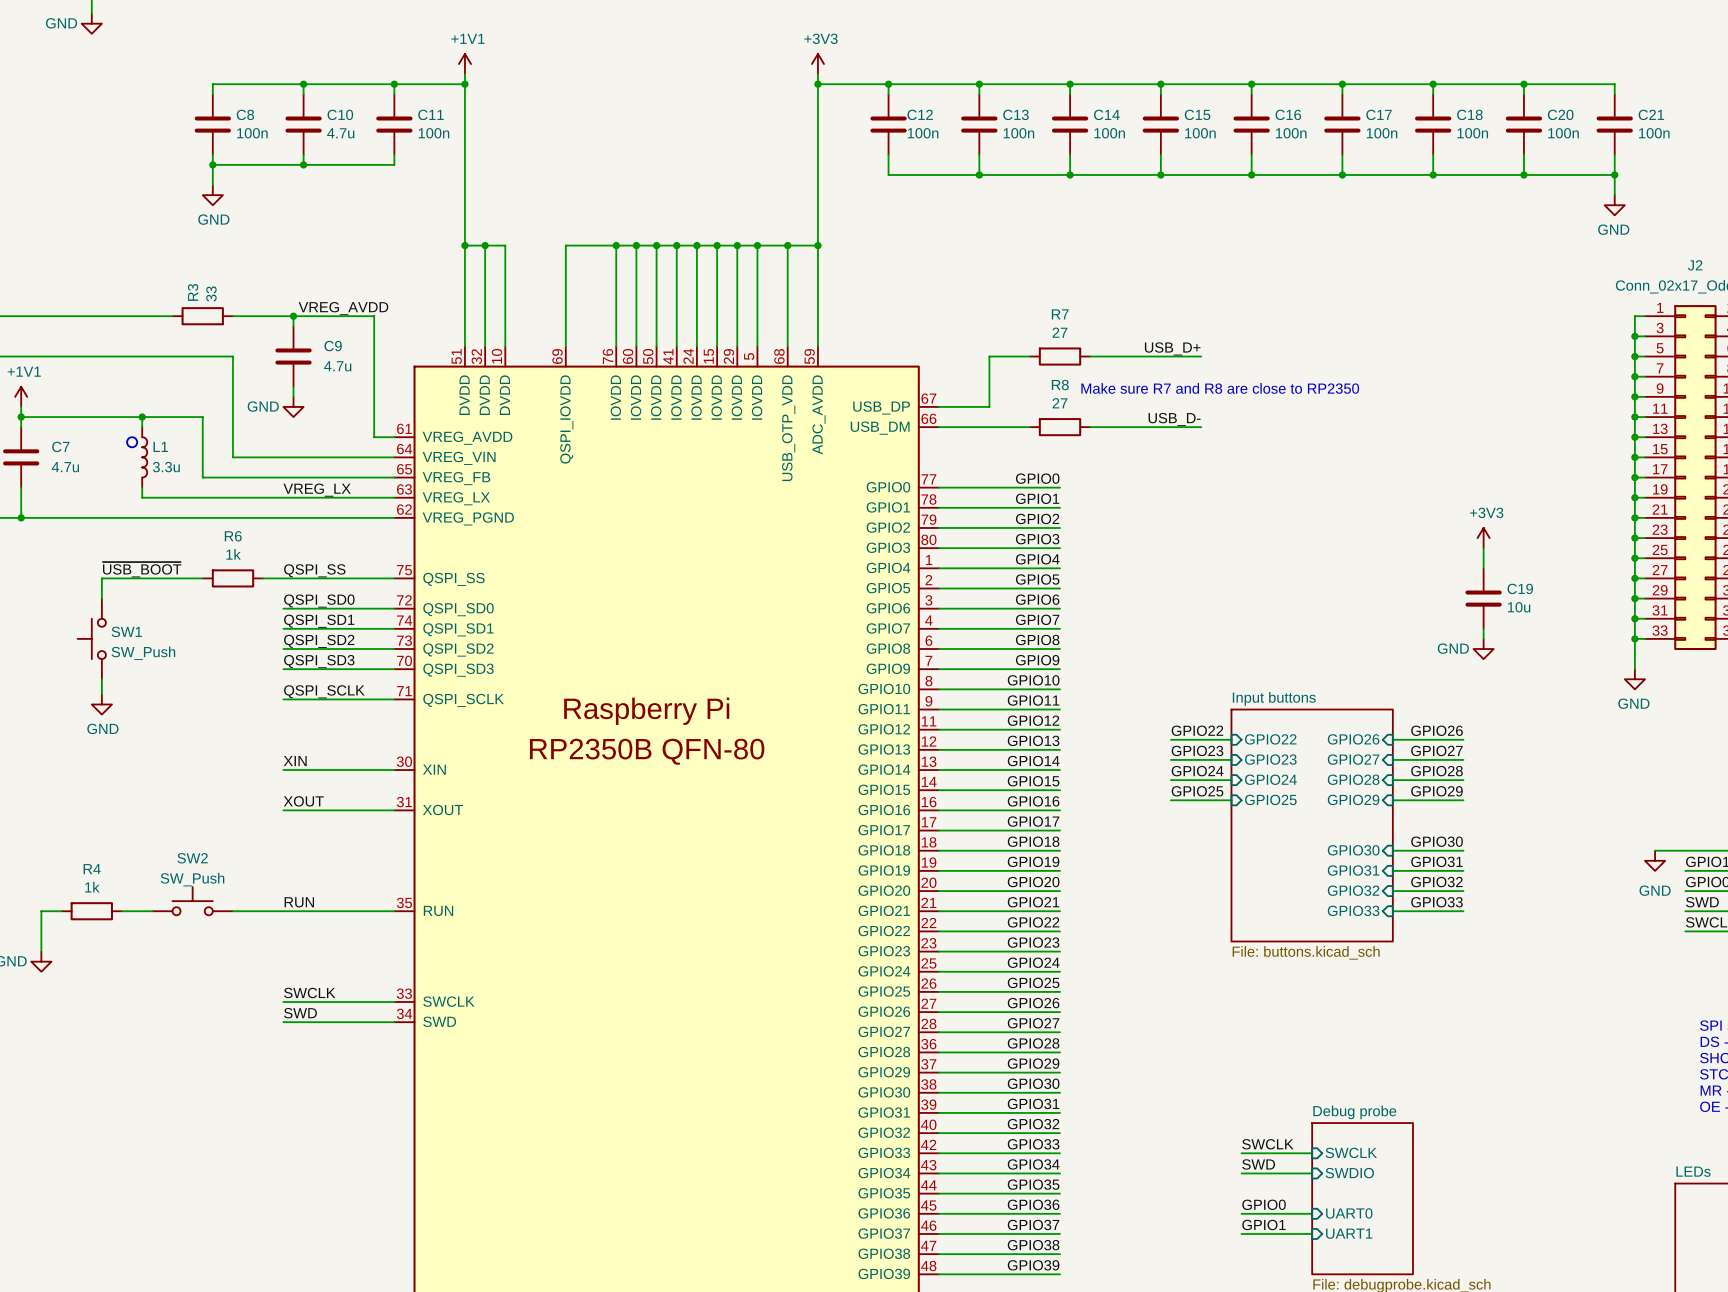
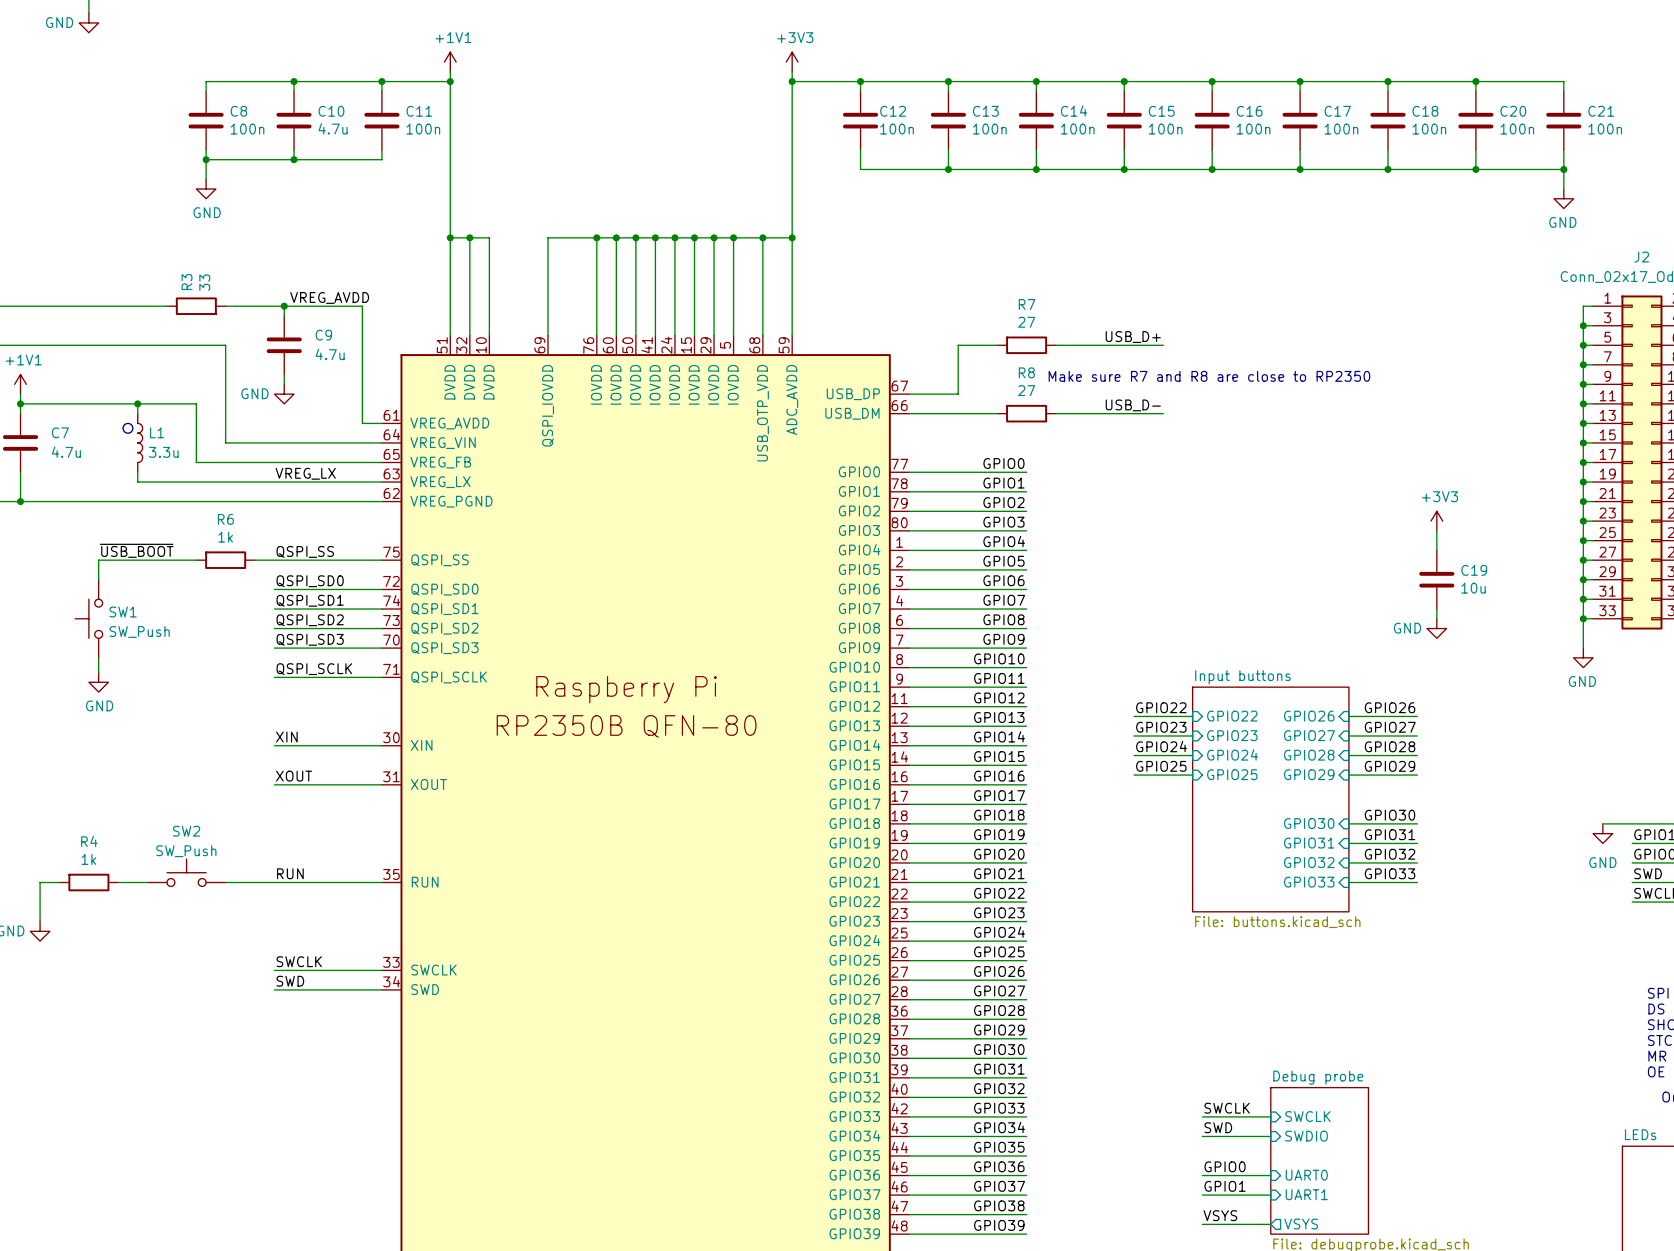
label: none -> VSYS (1220, 1215)
sheet pin: none -> VSYS (1301, 1224)
wire: none -> (1202, 1224) (1270, 1224)

